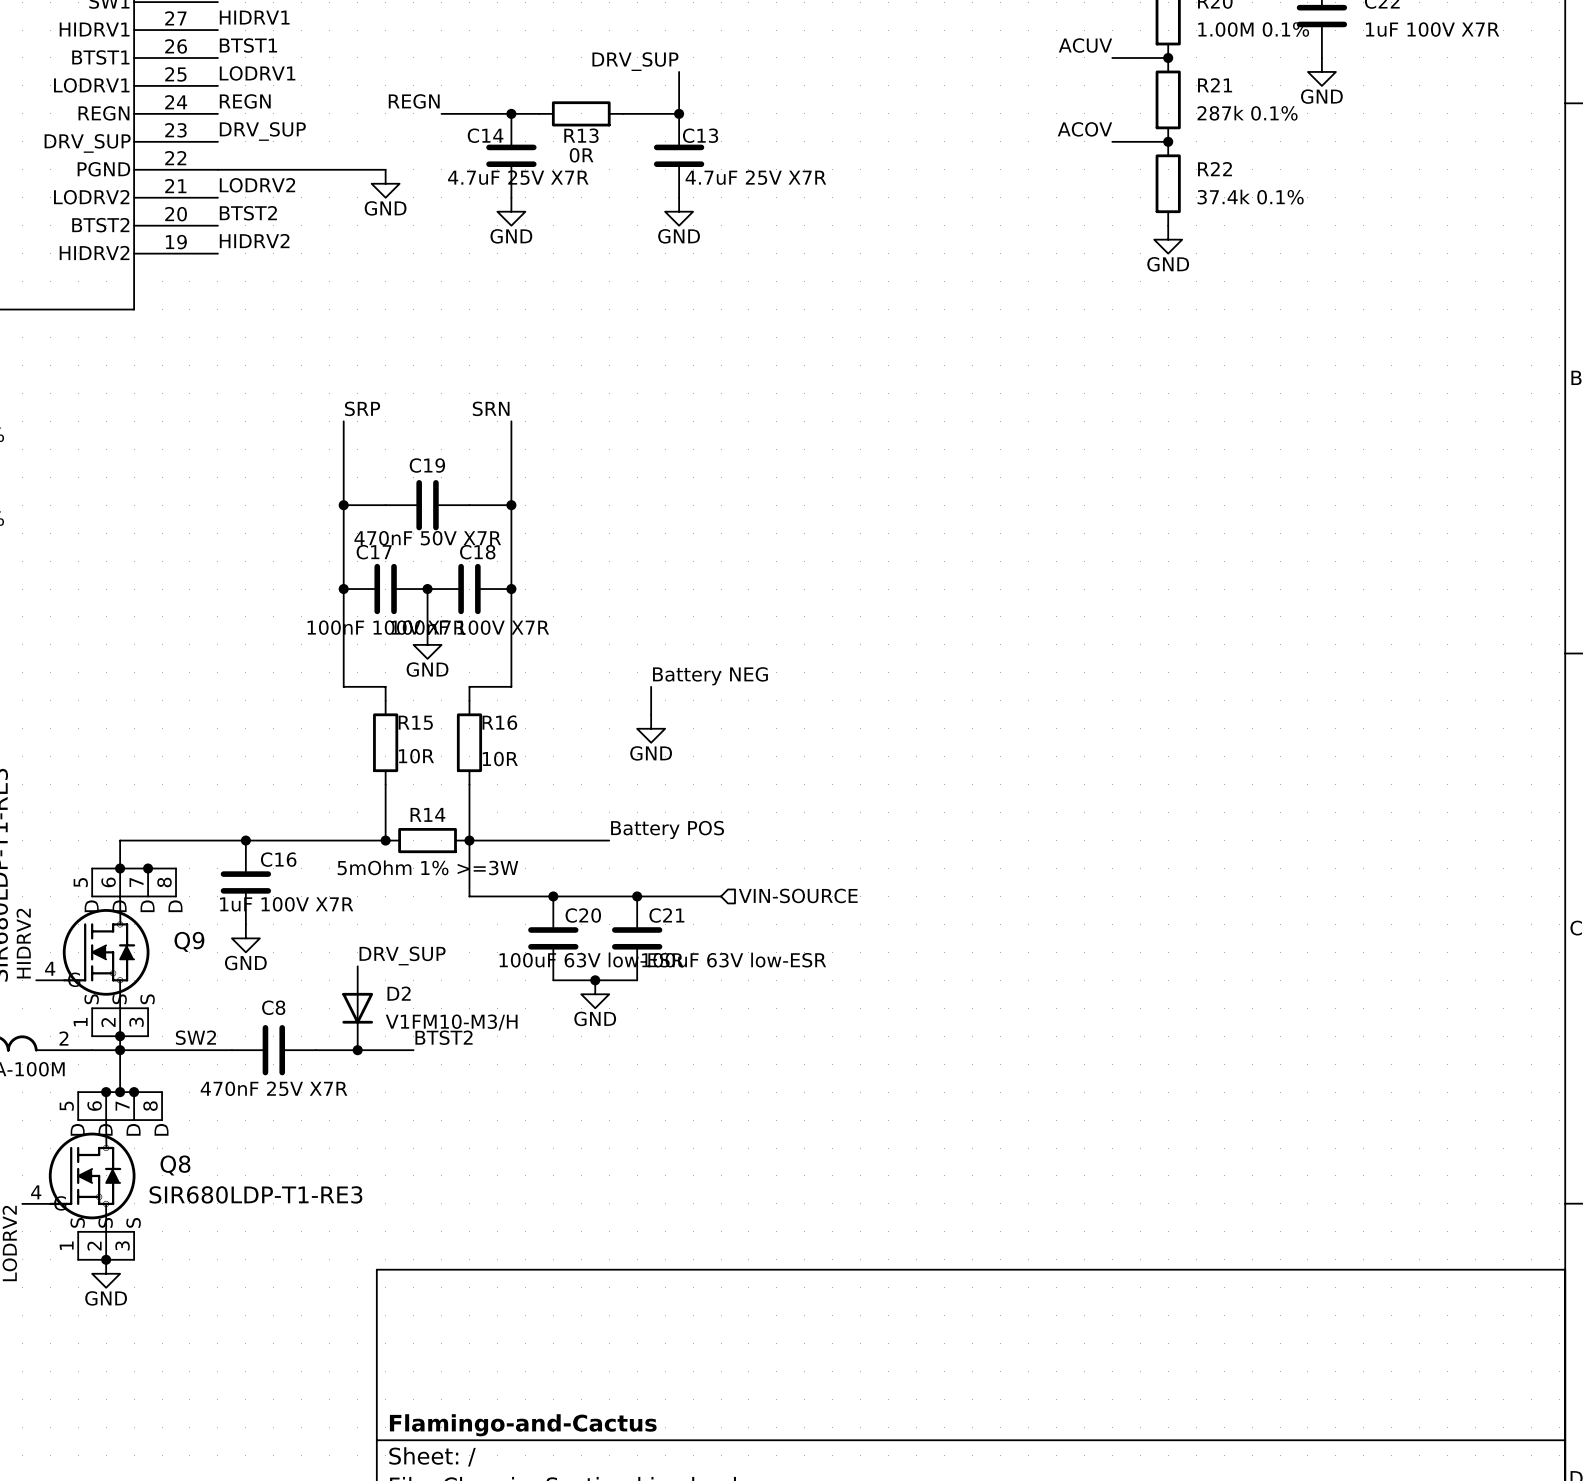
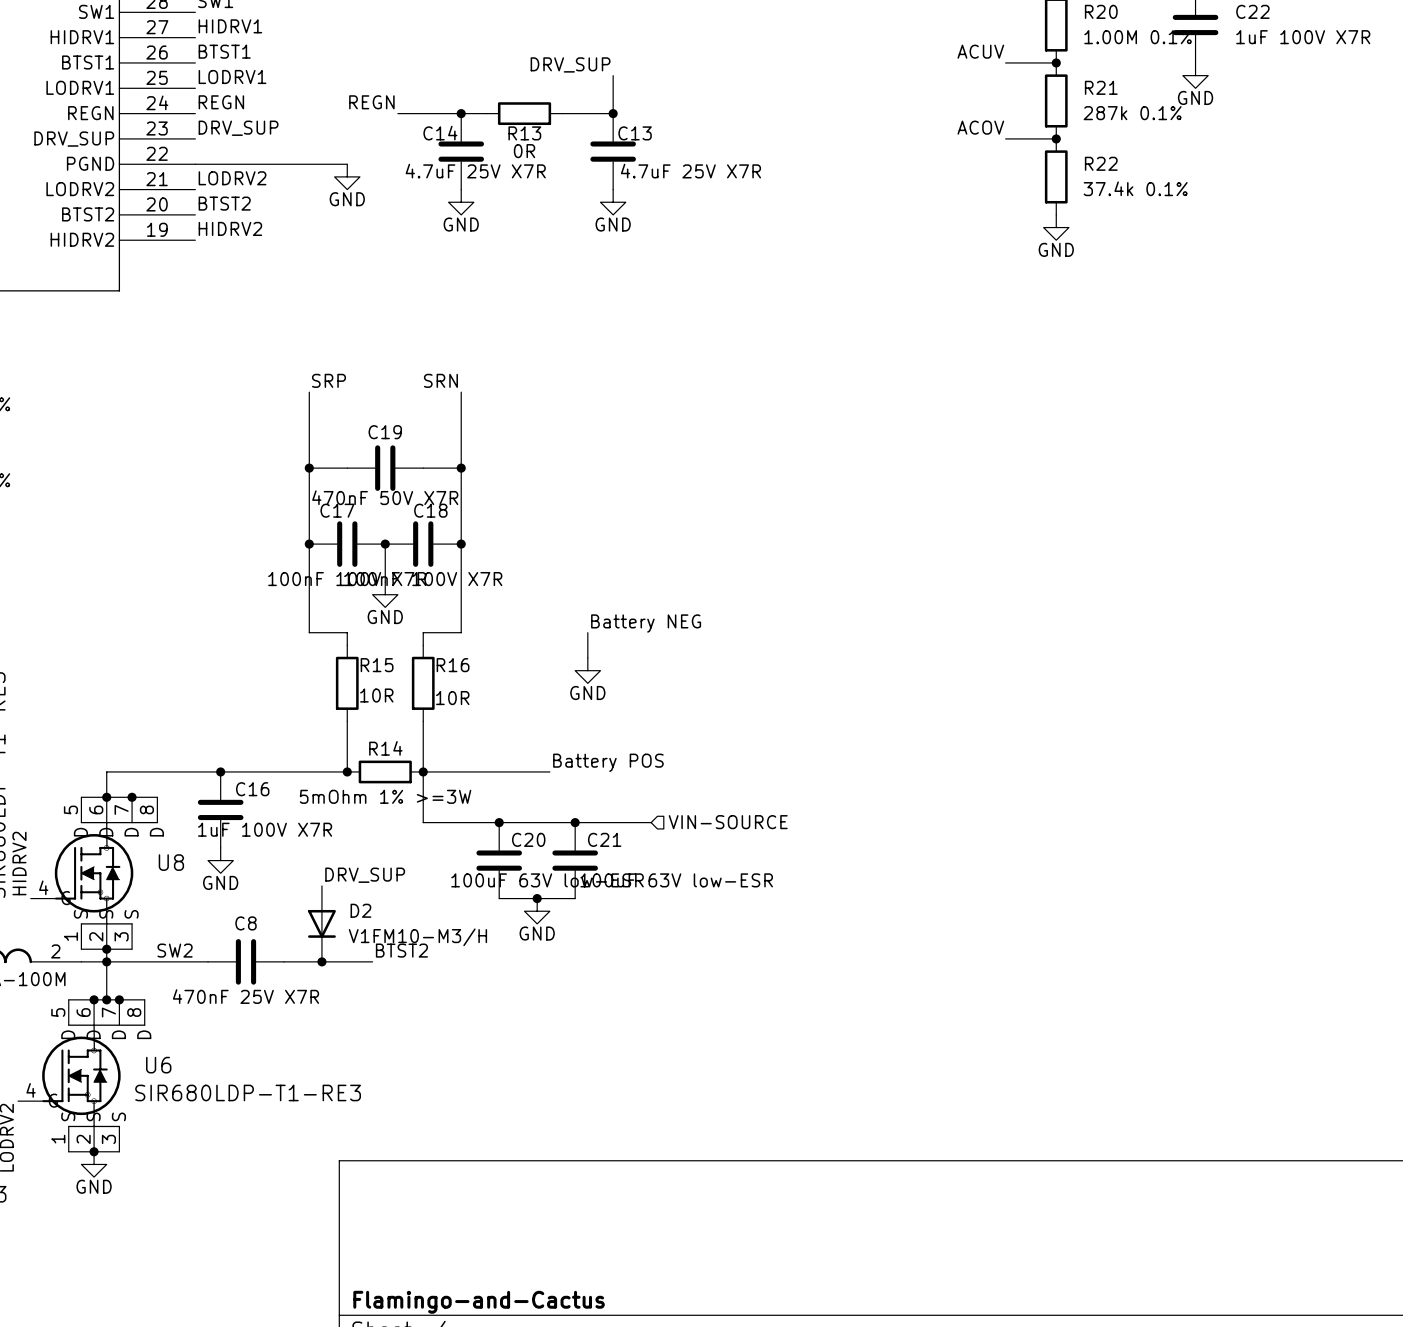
Q9 name: Q9 (189, 941) -> U8 (171, 862)
Q8 name: Q8 (175, 1165) -> U6 (158, 1065)

